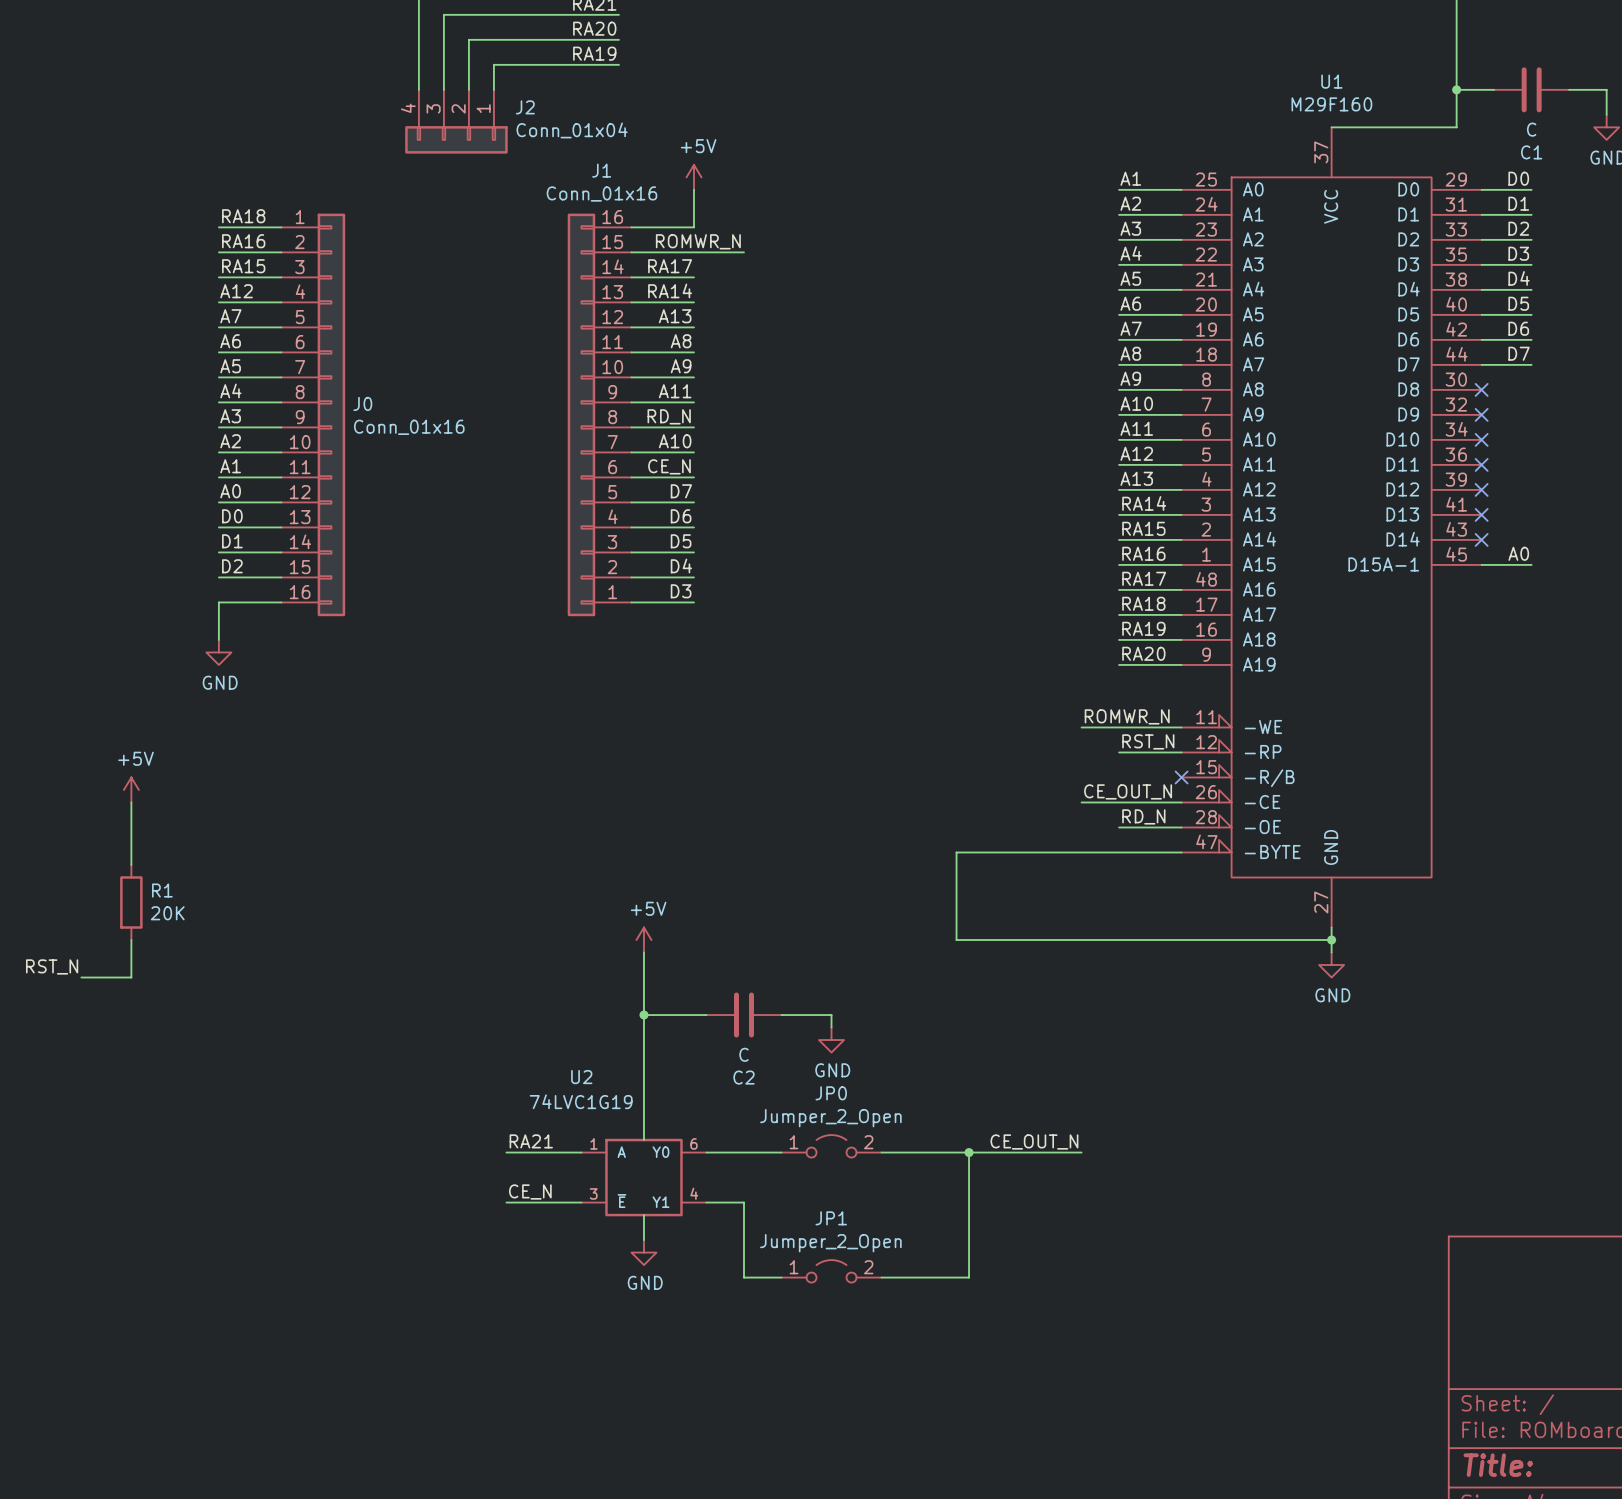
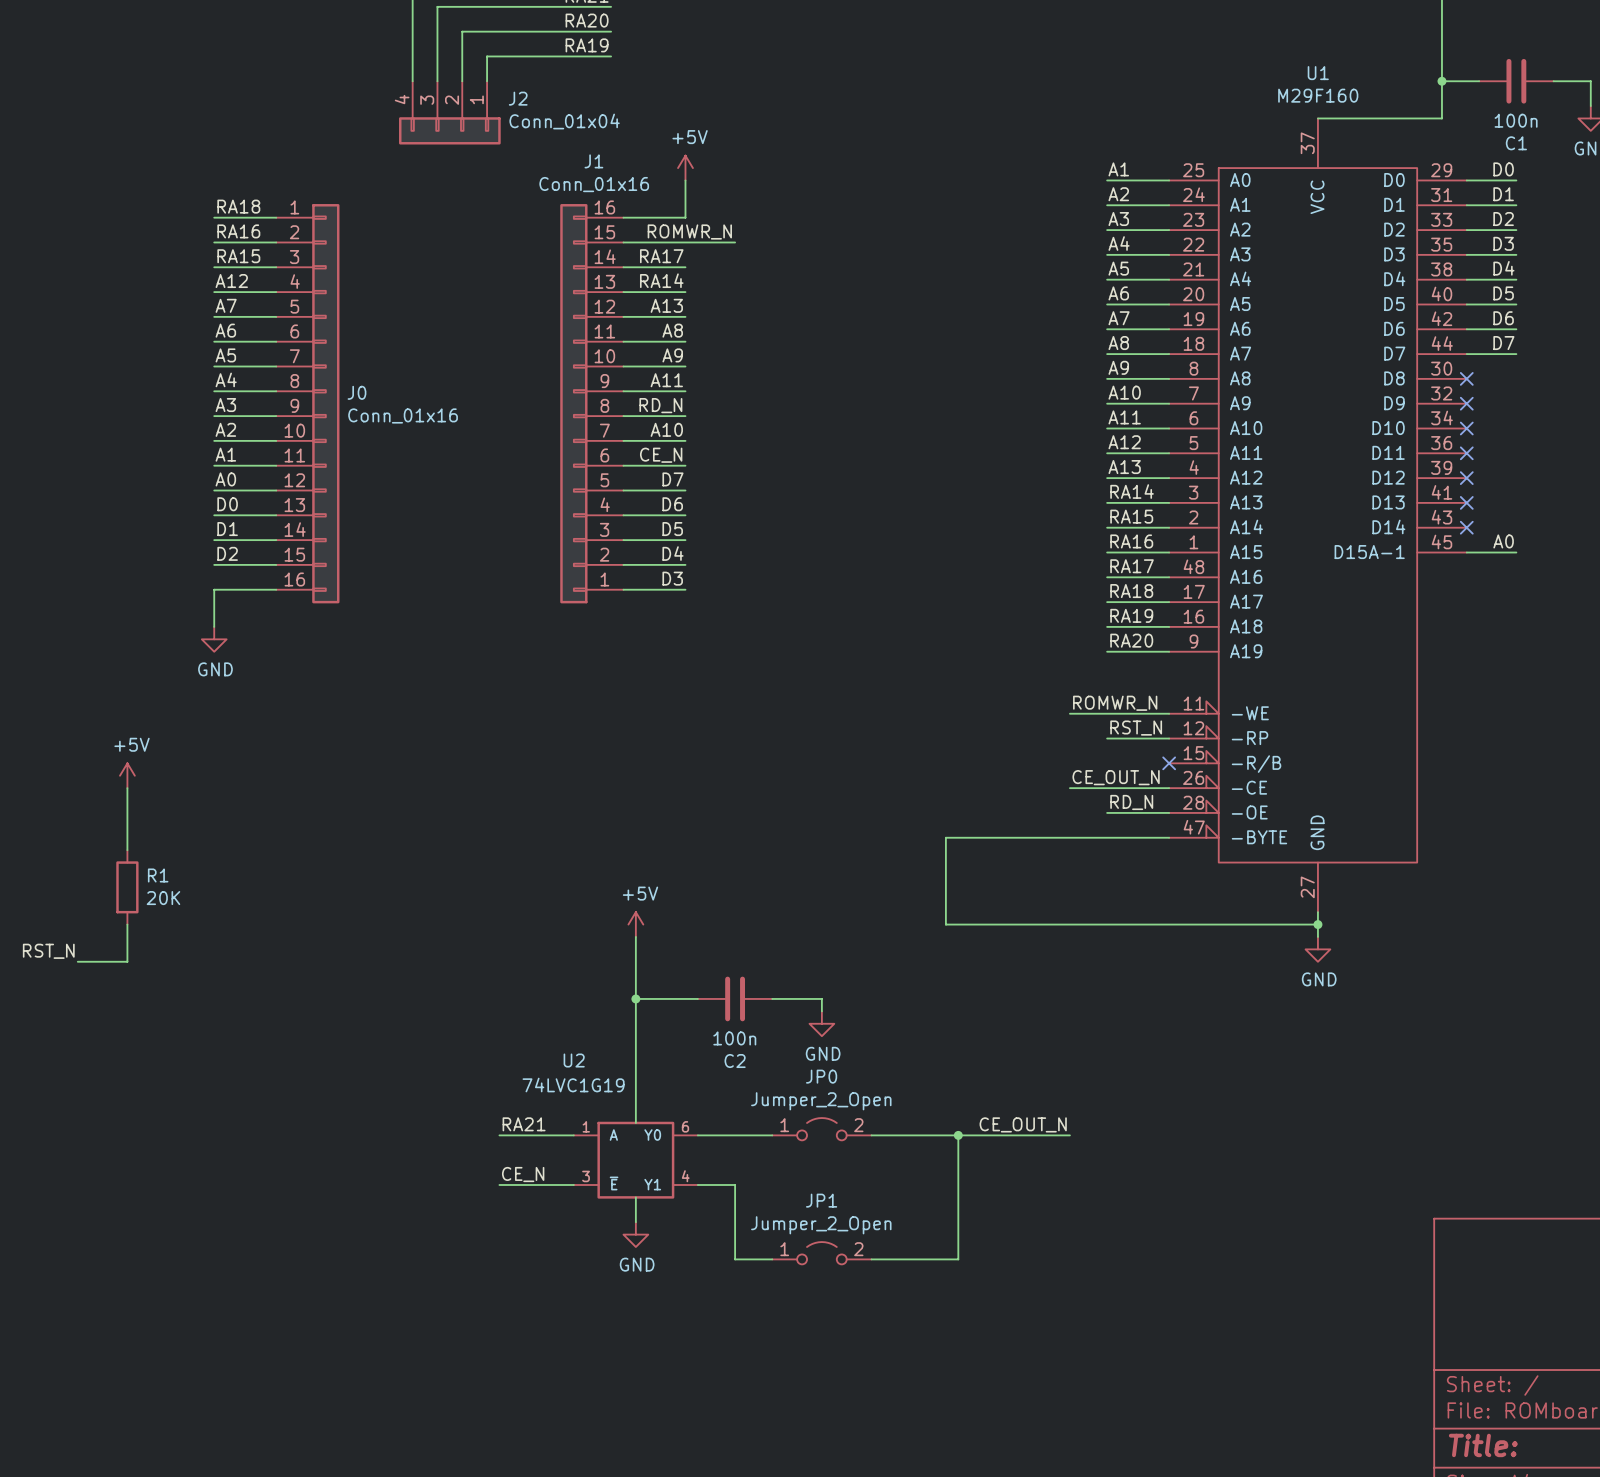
C1 value: C (1531, 129) -> 100n (1516, 120)
C2 value: C (743, 1054) -> 100n (734, 1038)

